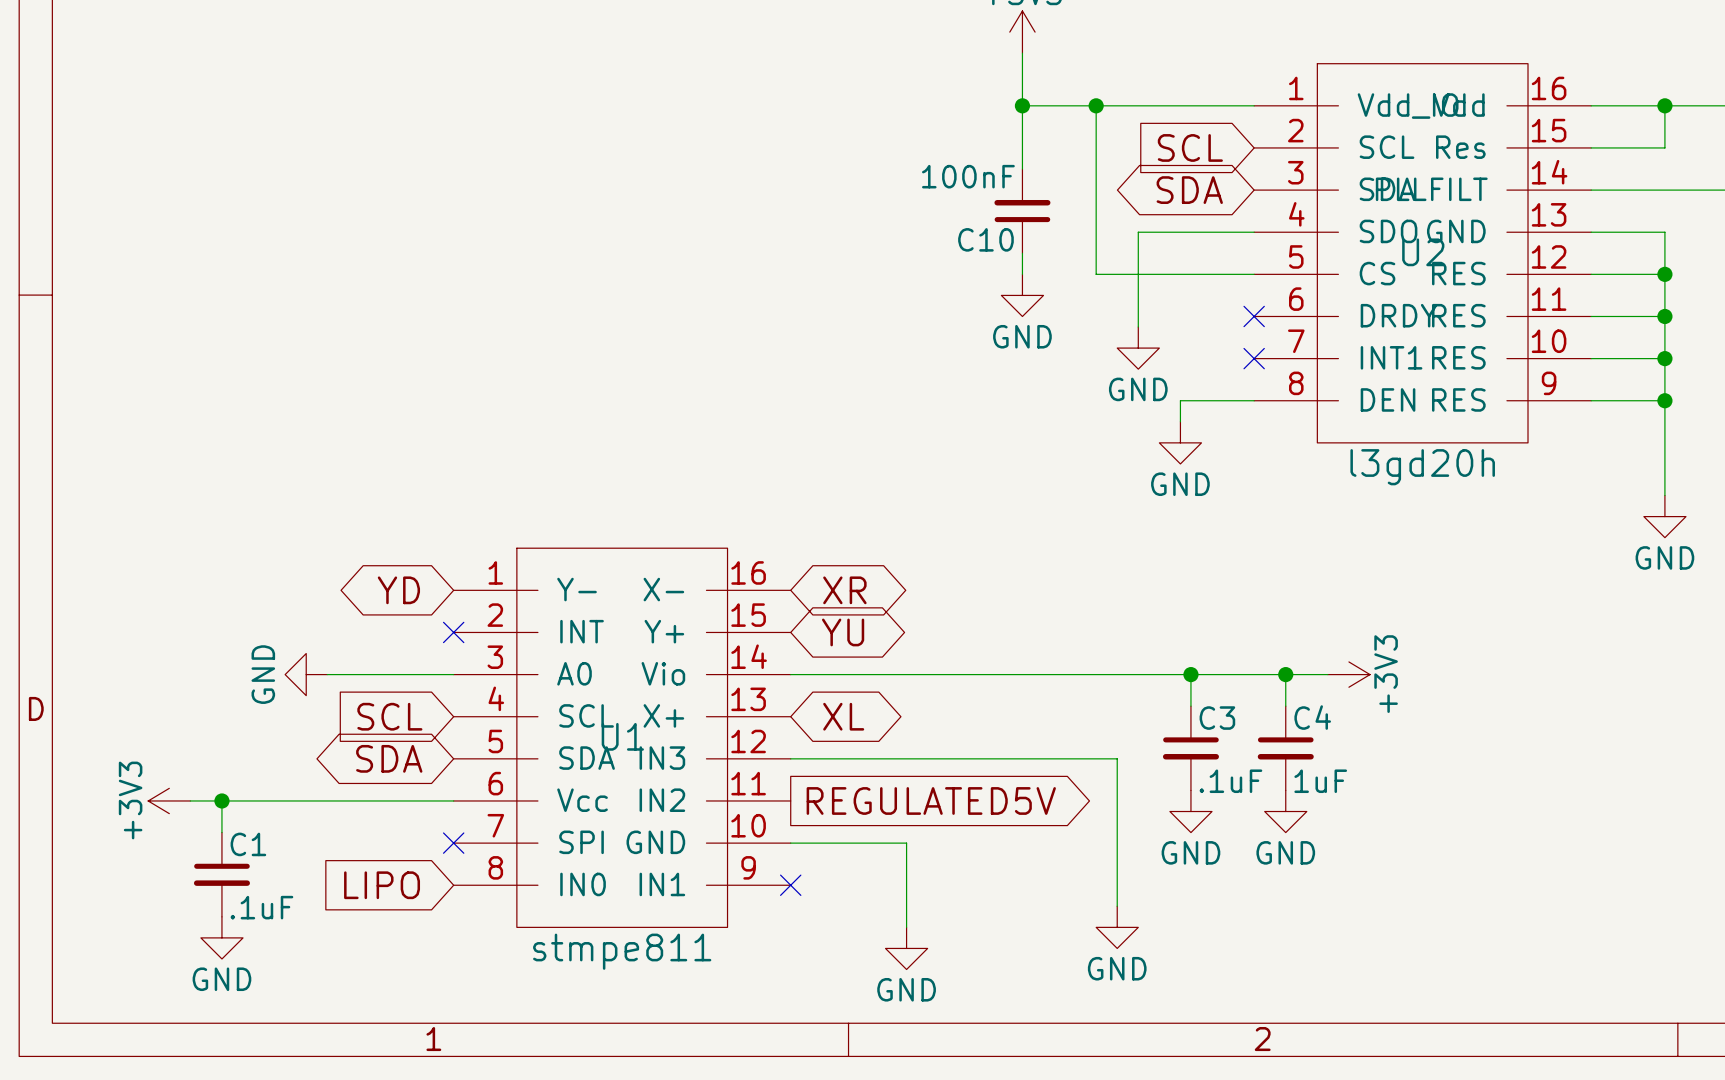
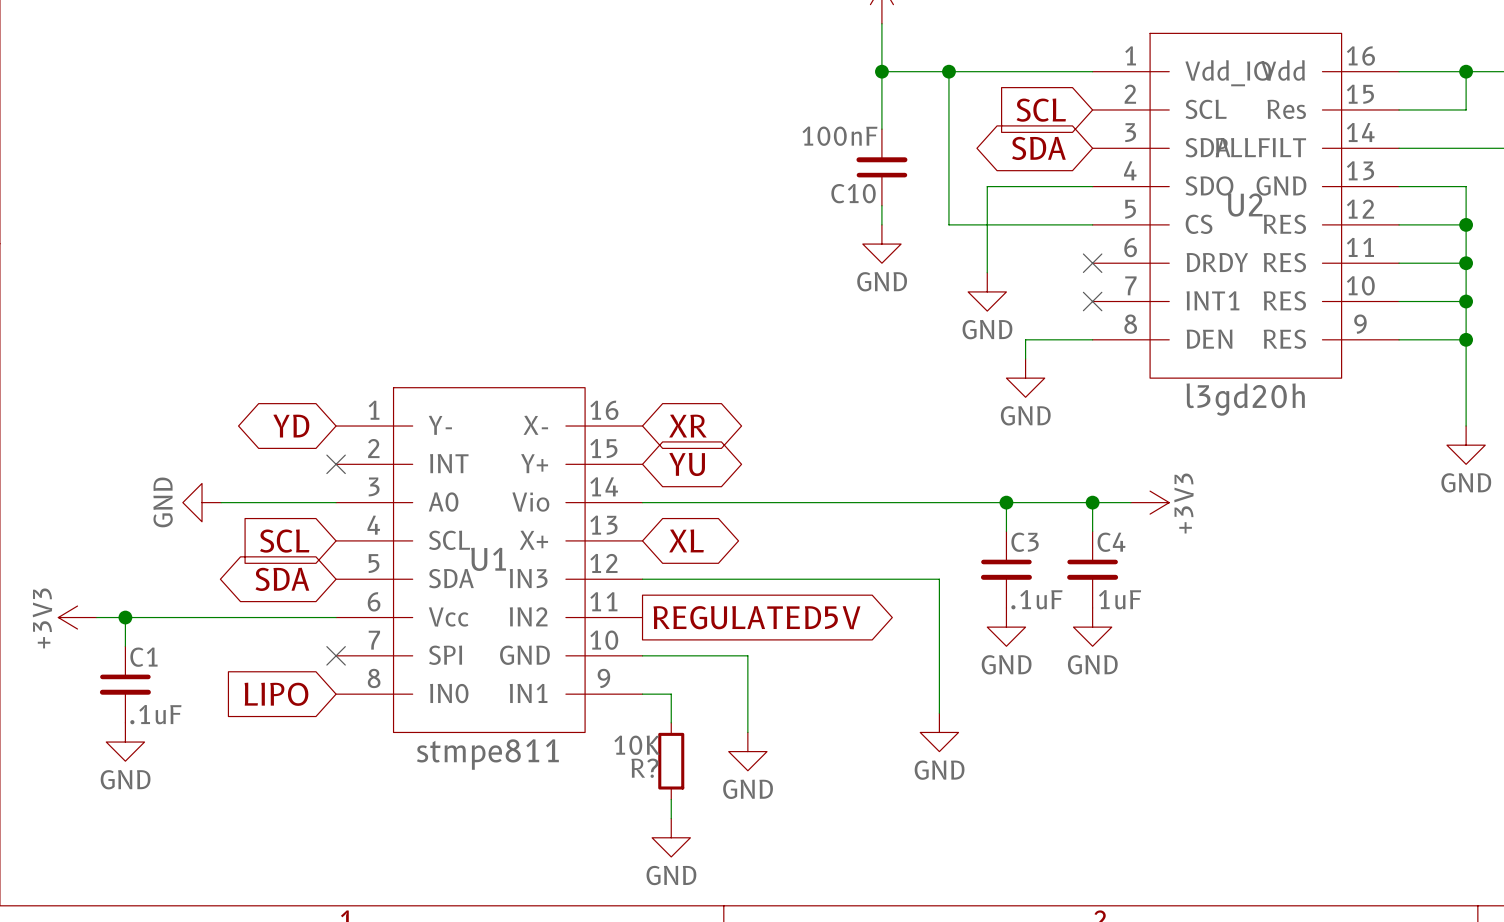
no-connect mark: none -> (336, 464)
junction: none -> (1006, 502)
junction: none -> (1092, 502)
global label position: YD (398, 590) -> YD (291, 426)
global label position: XR (844, 590) -> XR (687, 426)
no-connect mark: (453, 632) -> none
global label position: YU (843, 632) -> YU (687, 464)
power symbol position: GND (306, 674) -> GND (202, 502)
wire: (327, 674) (453, 674) -> (221, 502) (336, 502)
wire: (790, 674) (1327, 674) -> (642, 502) (1130, 502)
wire: (1190, 674) (1190, 706) -> (1006, 502) (1006, 531)
junction: (1190, 674) -> none
wire: (1285, 674) (1285, 706) -> (1092, 502) (1092, 531)
junction: (1285, 674) -> none
power symbol position: +3V3 (1348, 674) -> +3V3 (1150, 502)
junction: none -> (125, 617)
global label position: SCL (389, 716) -> SCL (284, 541)
global label position: XL (843, 716) -> XL (686, 540)
power symbol: none -> GND (1006, 627)
power symbol: none -> GND (1092, 627)
U1 position: (622, 737) -> (489, 560)
no-connect mark: none -> (336, 655)
C3 position: (1190, 748) -> (1006, 569)
C4 position: (1285, 748) -> (1092, 569)
global label position: SDA (389, 758) -> SDA (282, 579)
wire: (790, 758) (1117, 758) (1117, 906) -> (642, 579) (939, 579) (939, 713)
wire: none -> (642, 694) (671, 694) (671, 722)
power symbol position: +3V3 (169, 800) -> +3V3 (77, 617)
wire: (190, 800) (453, 800) -> (96, 617) (336, 617)
wire: (221, 800) (221, 832) -> (125, 617) (125, 646)
junction: (221, 800) -> none
global label position: REGULATED5V (931, 800) -> REGULATED5V (756, 617)
power symbol: GND (1190, 811) -> none
power symbol: GND (1285, 811) -> none
power symbol: none -> GND (939, 732)
no-connect mark: (453, 843) -> none
wire: (790, 843) (906, 843) (906, 927) -> (642, 655) (747, 655) (747, 732)
power symbol: none -> GND (747, 751)
R?: none -> 10K (671, 761)
C1 position: (221, 874) -> (125, 684)
global label position: LIPO (382, 885) -> LIPO (276, 694)
no-connect mark: (790, 885) -> none
wire: none -> (671, 799) (671, 818)
power symbol: GND (1117, 927) -> none
power symbol position: GND (221, 937) -> GND (125, 742)
power symbol: none -> GND (671, 837)
power symbol: GND (906, 948) -> none

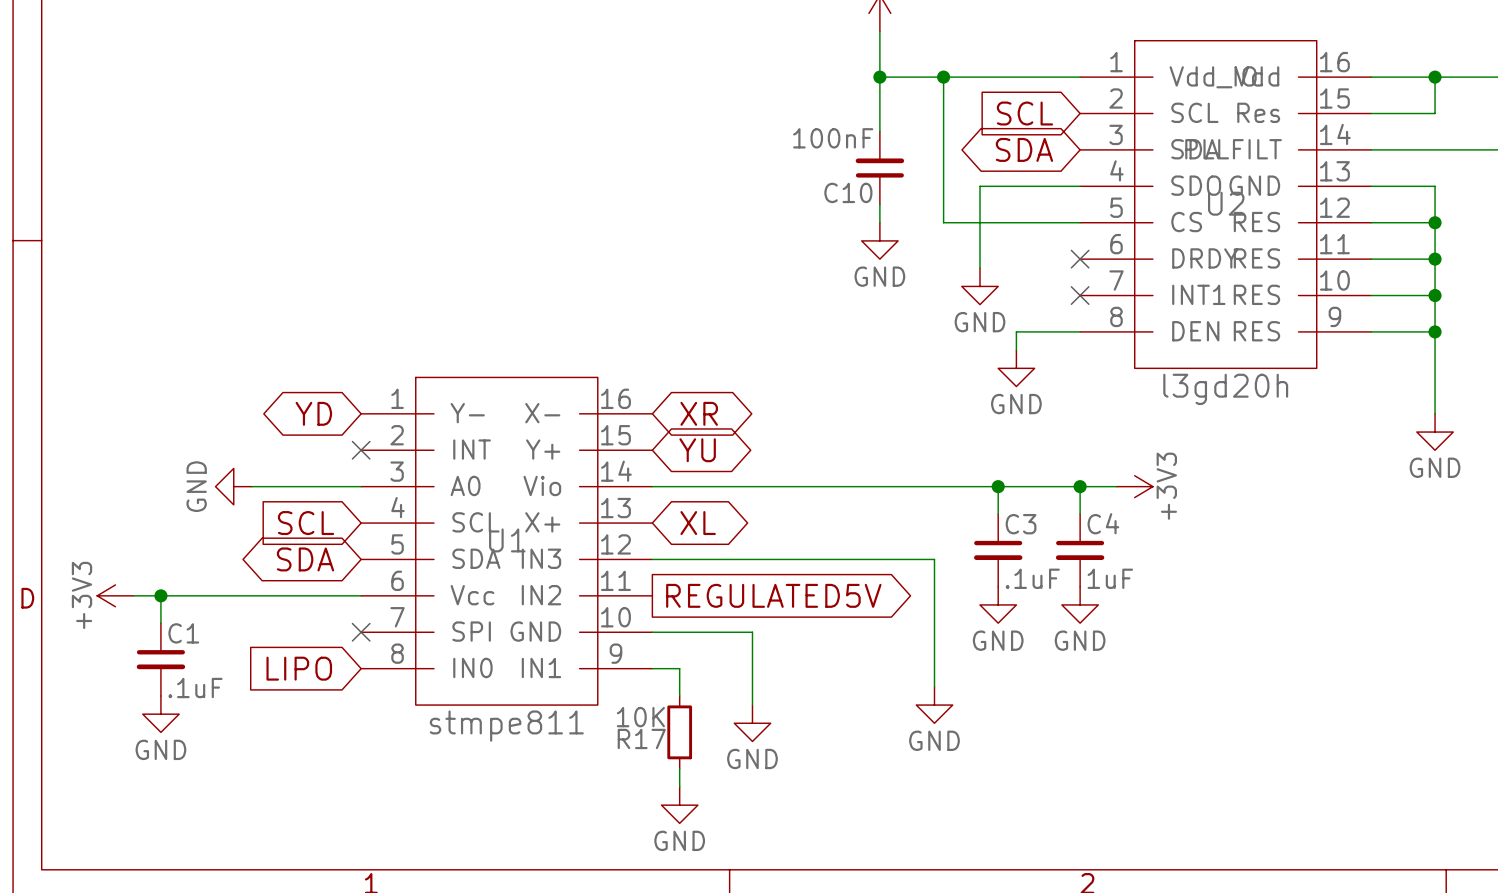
R? name: R? (644, 768) -> R17 (641, 738)

